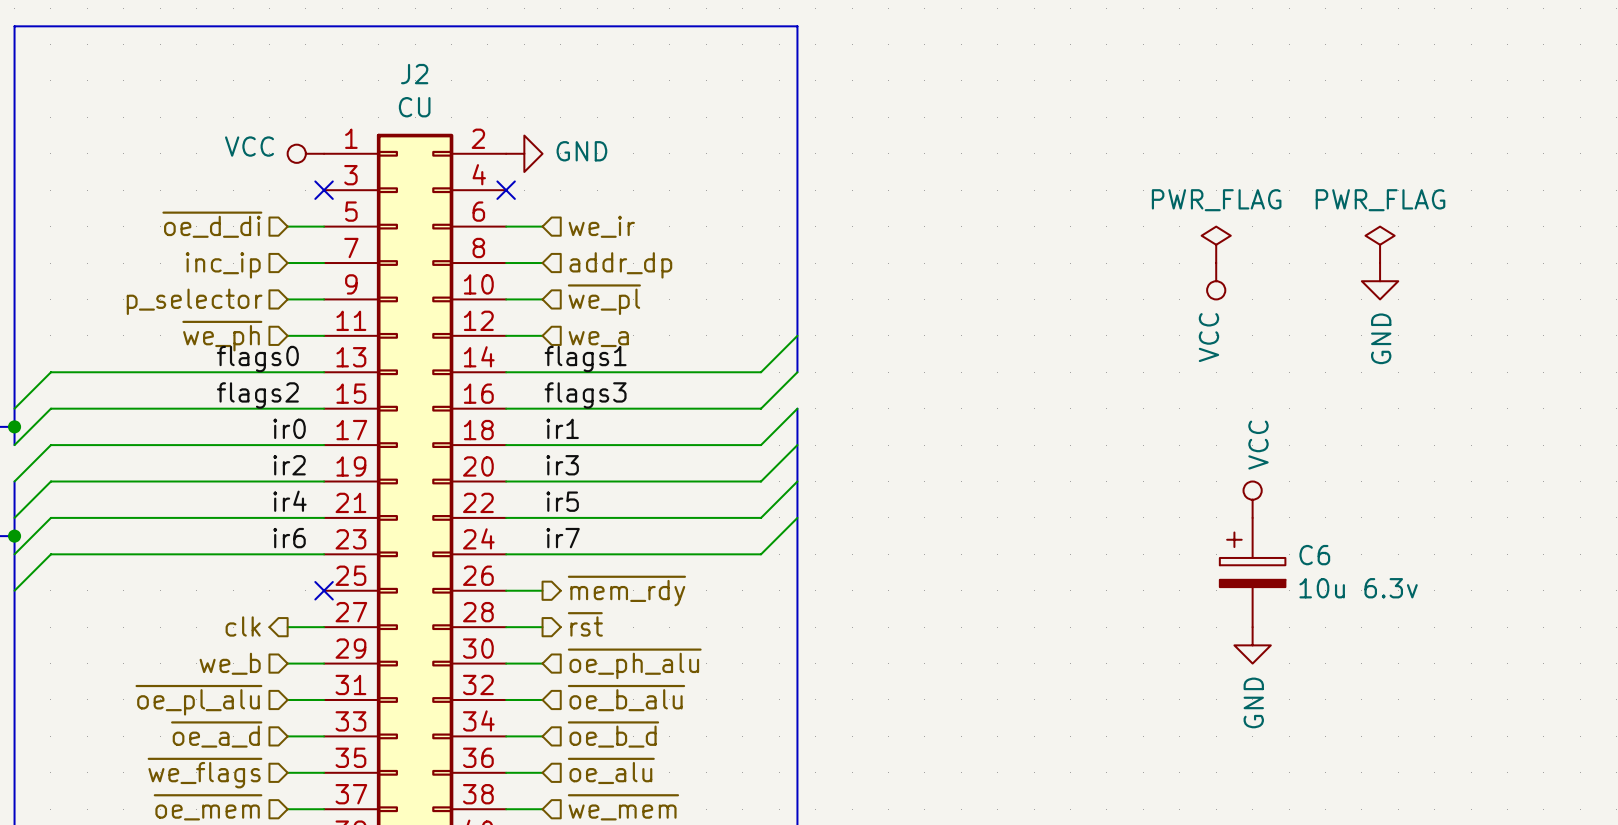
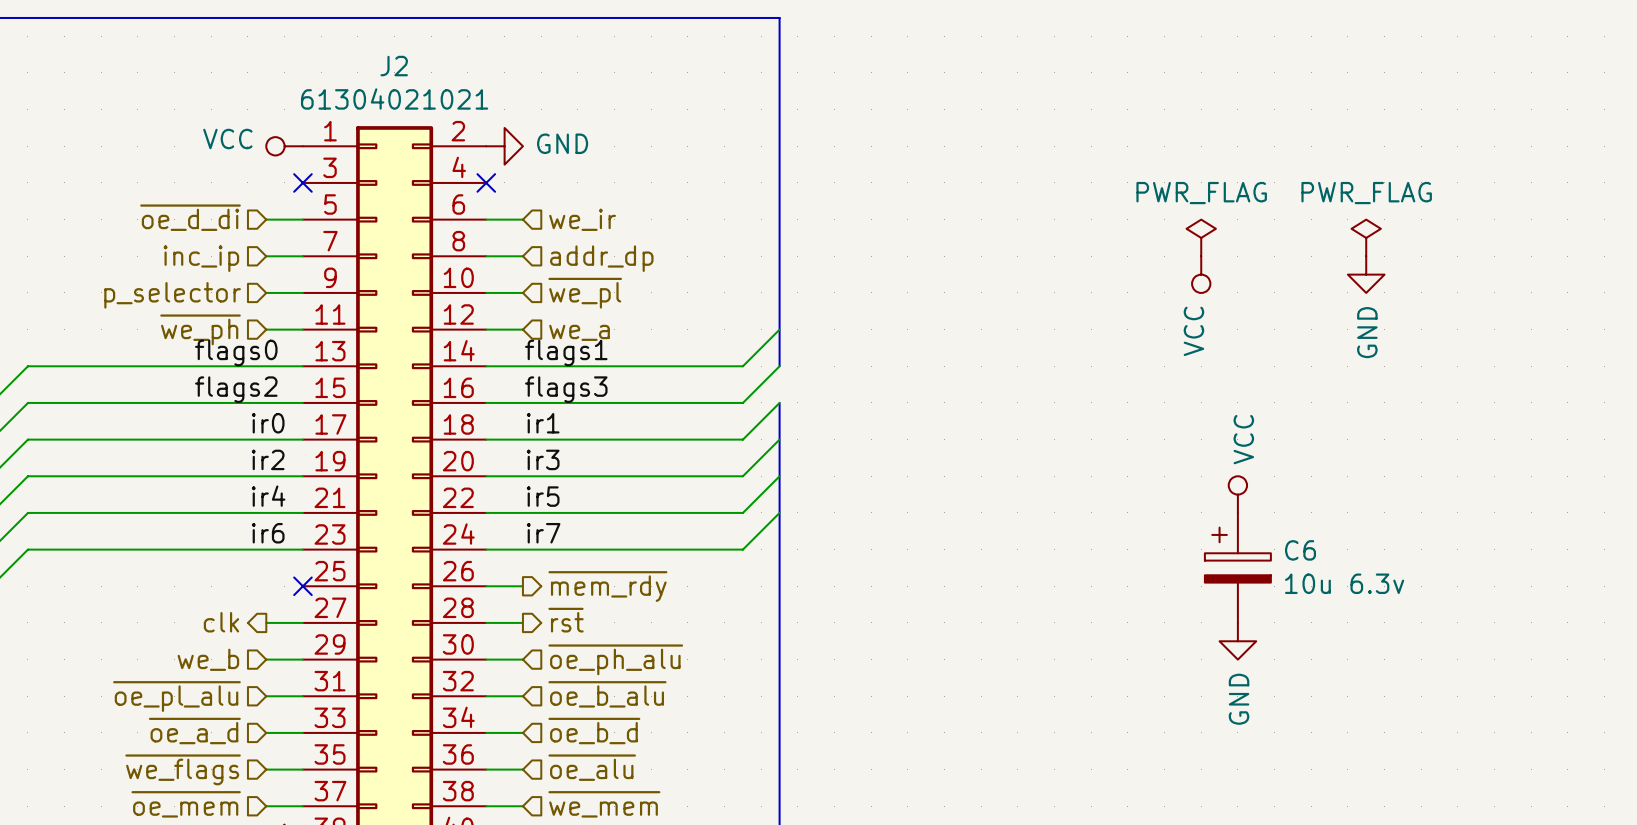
J2 value: CU (414, 107) -> 61304021021 (394, 98)

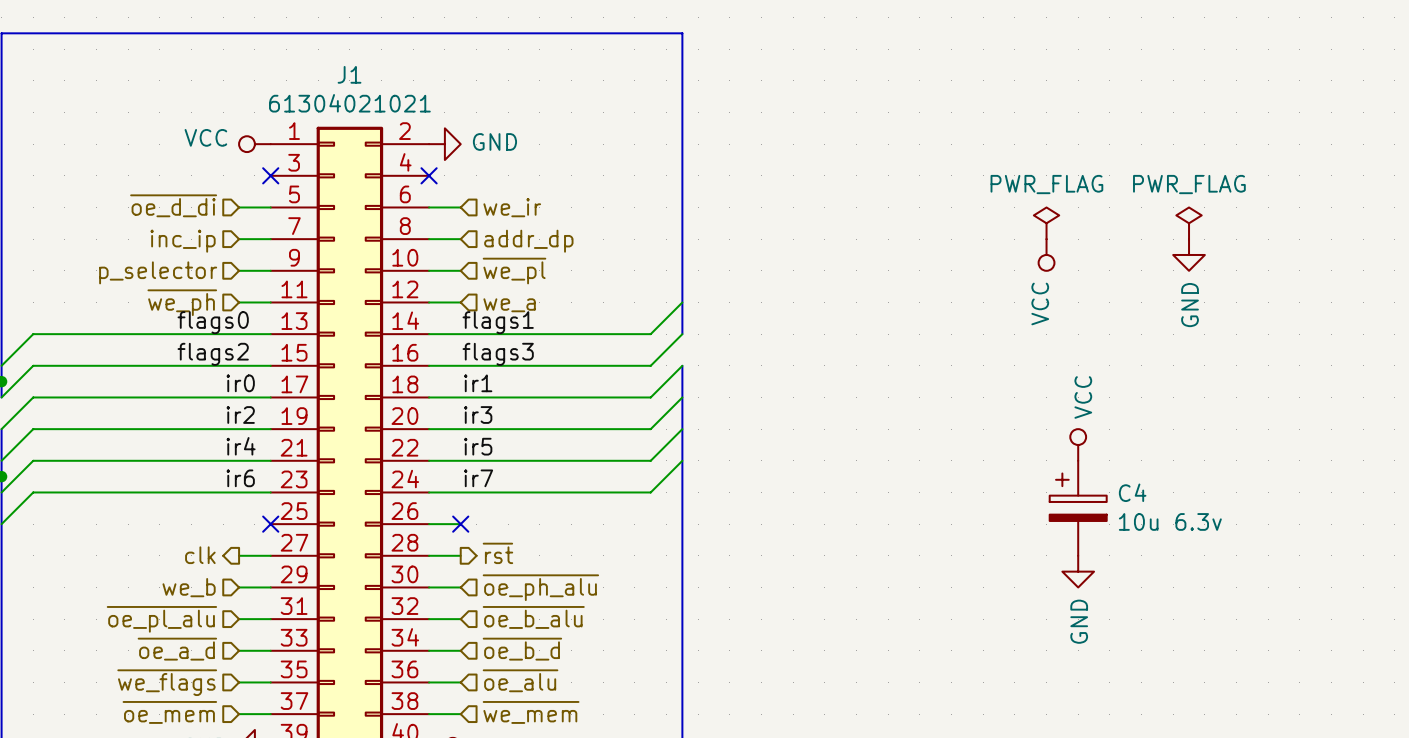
J2 name: J2 (394, 66) -> J1 (349, 74)
C6 name: C6 (1300, 550) -> C4 (1132, 492)
no-connect mark: none -> (460, 524)
hierarchical label: ~{mem_rdy} (607, 586) -> none

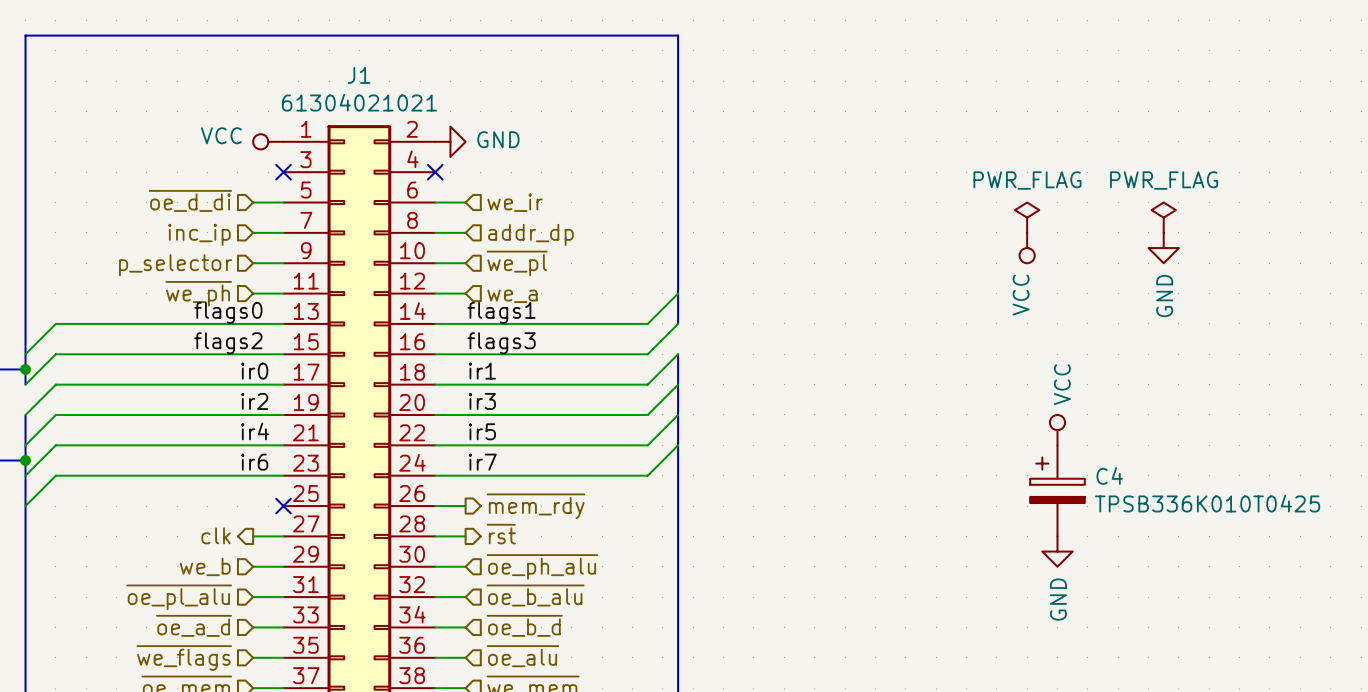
C4 value: 10u 6.3v (1170, 521) -> TPSB336K010T0425 (1207, 503)
no-connect mark: (460, 524) -> none
hierarchical label: none -> ~{mem_rdy} (535, 506)

